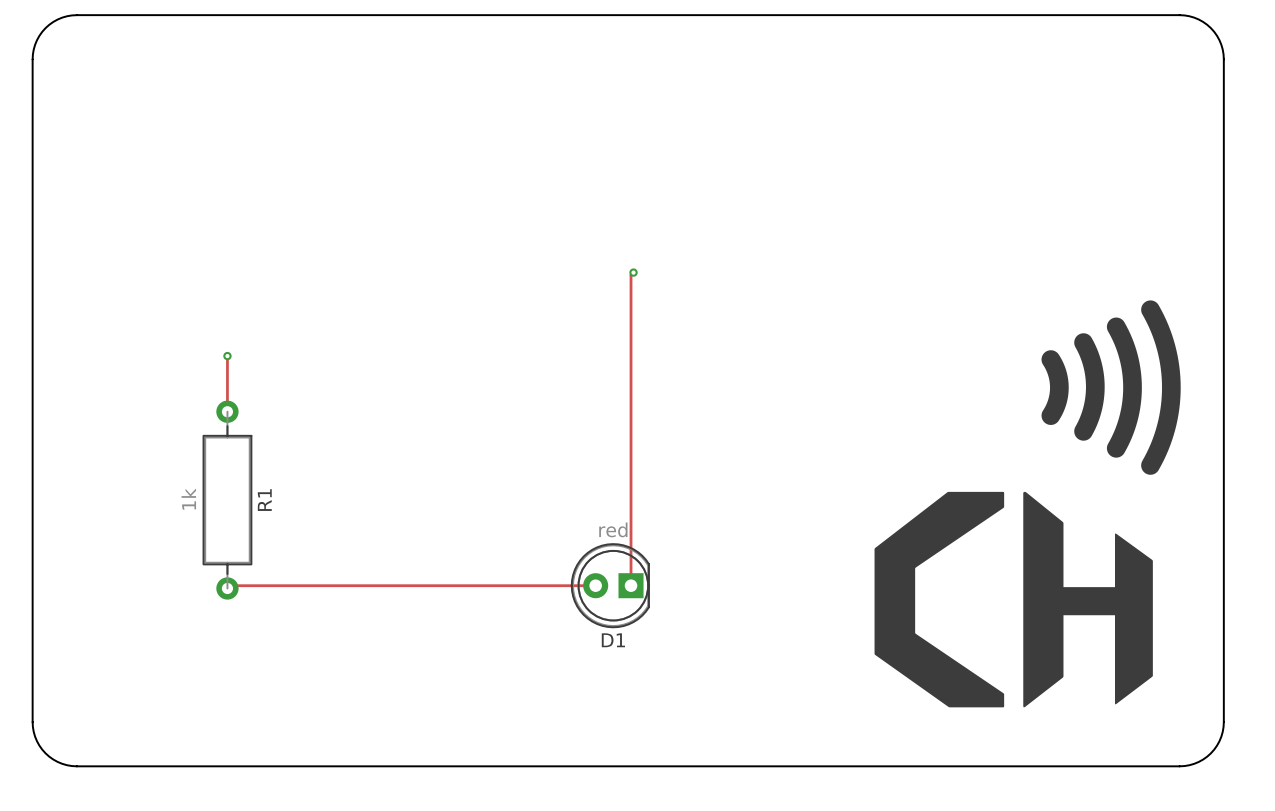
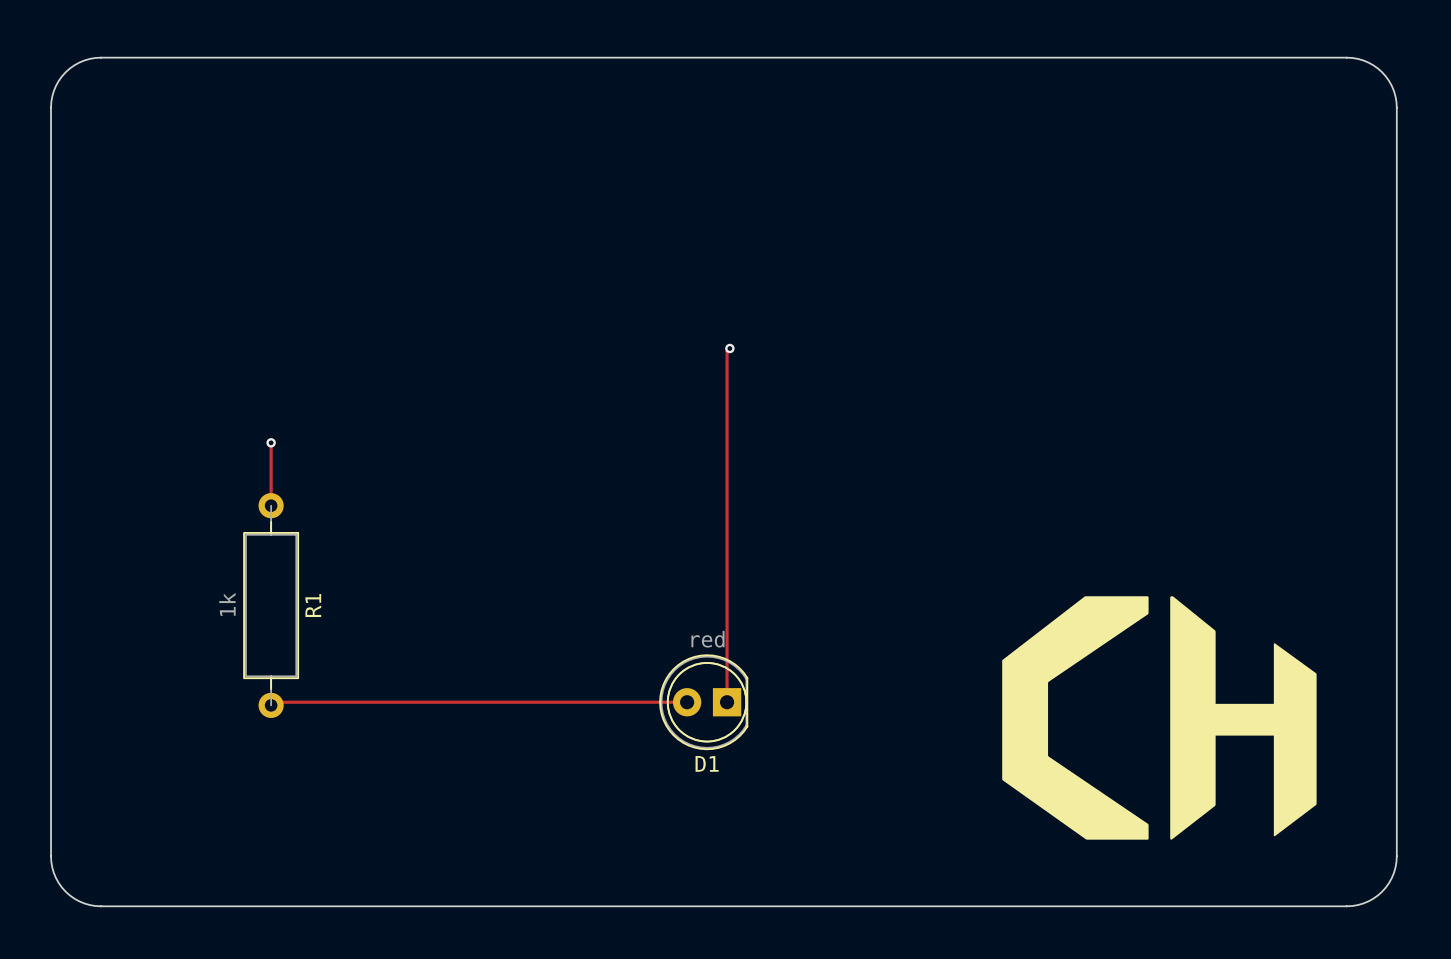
drawing: [1041, 300, 1181, 475] -> none

